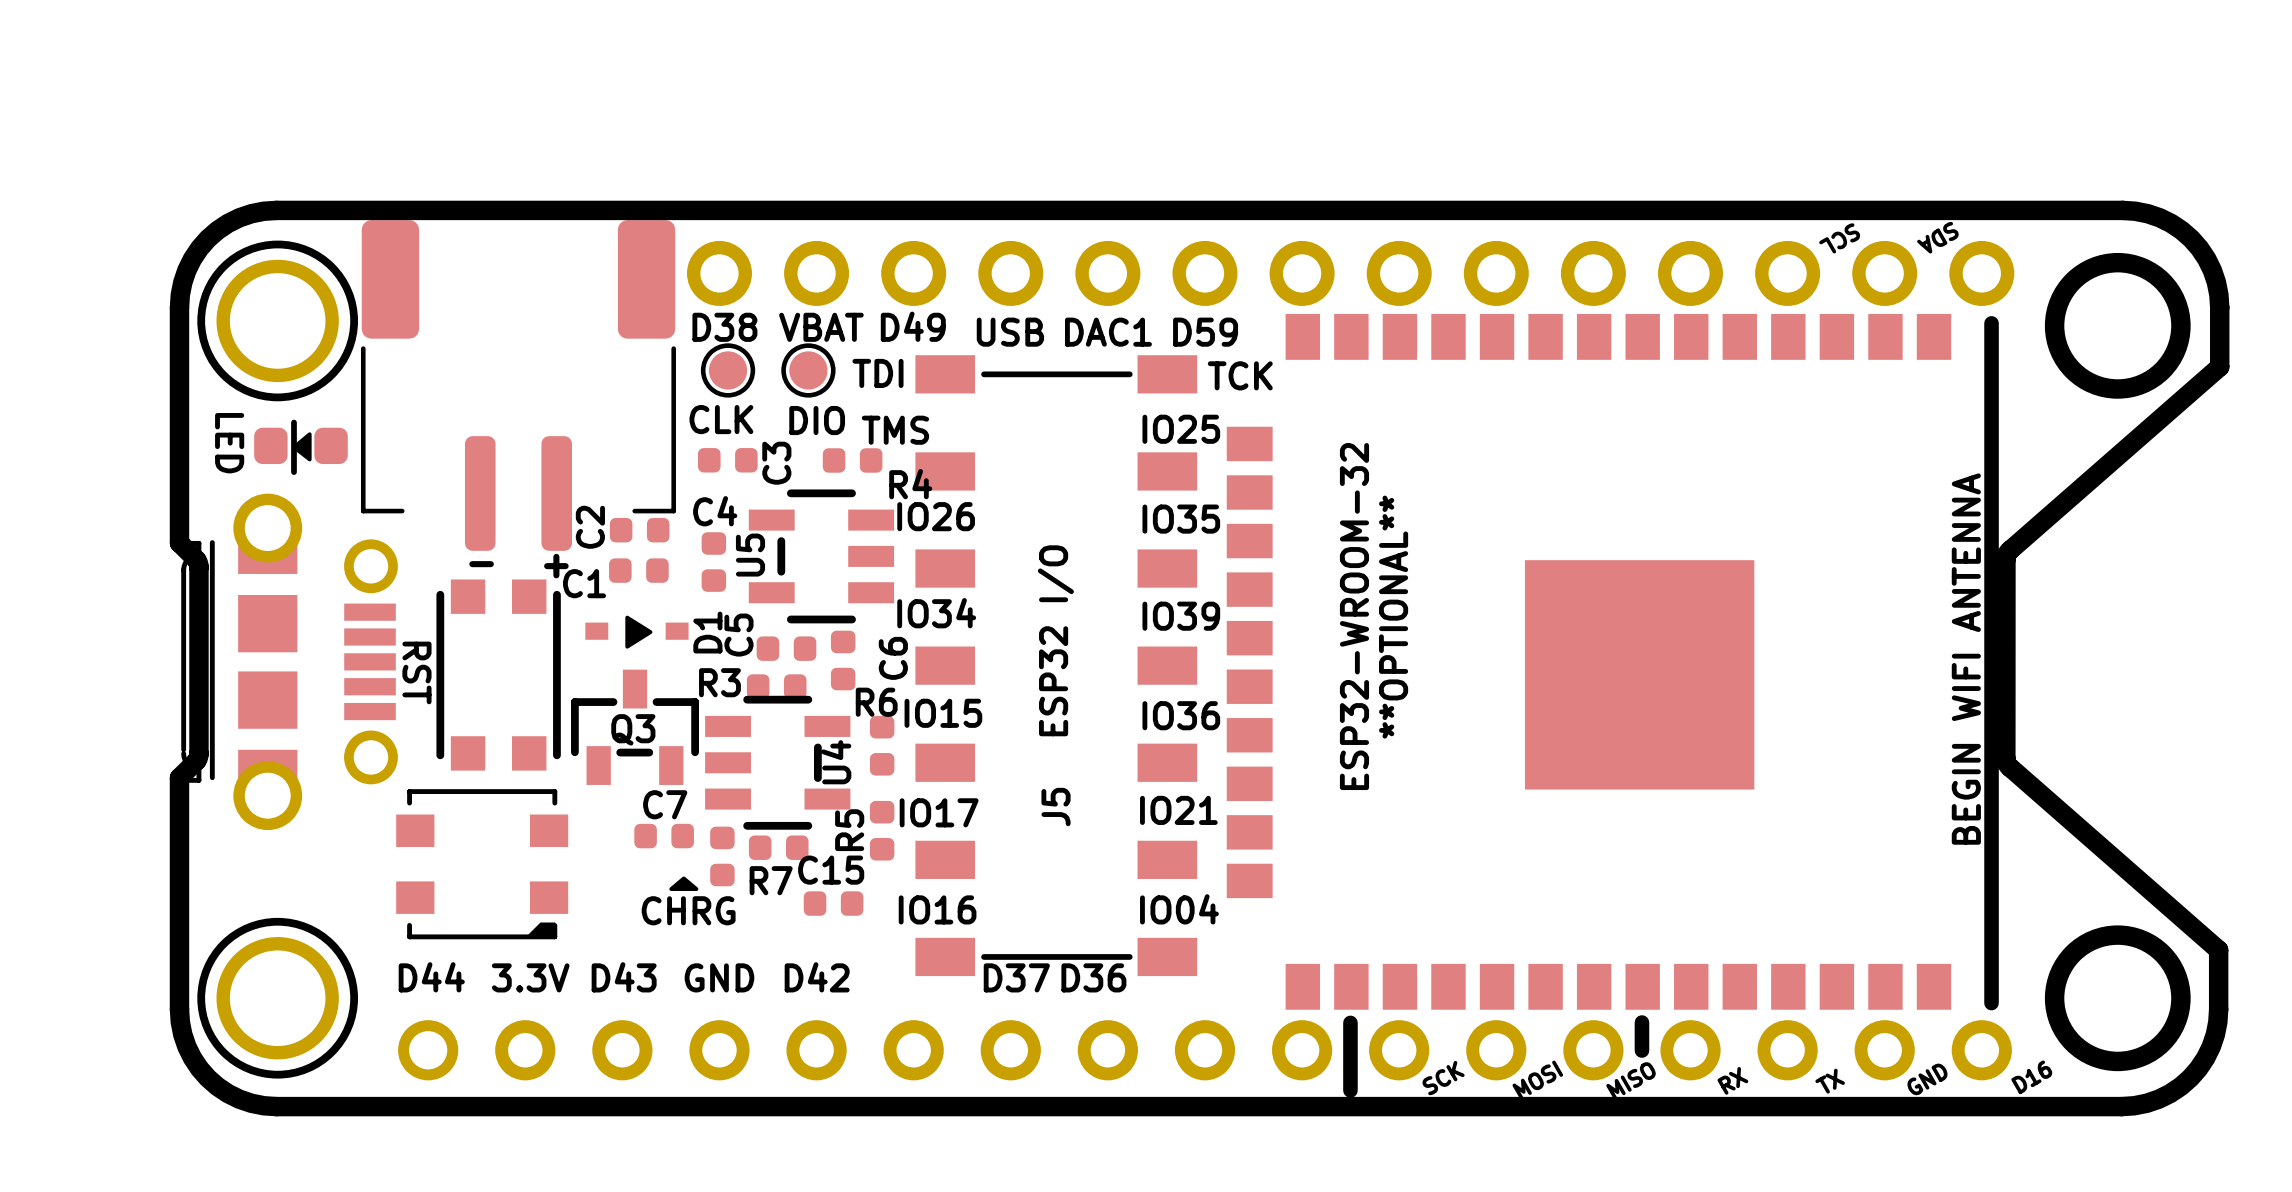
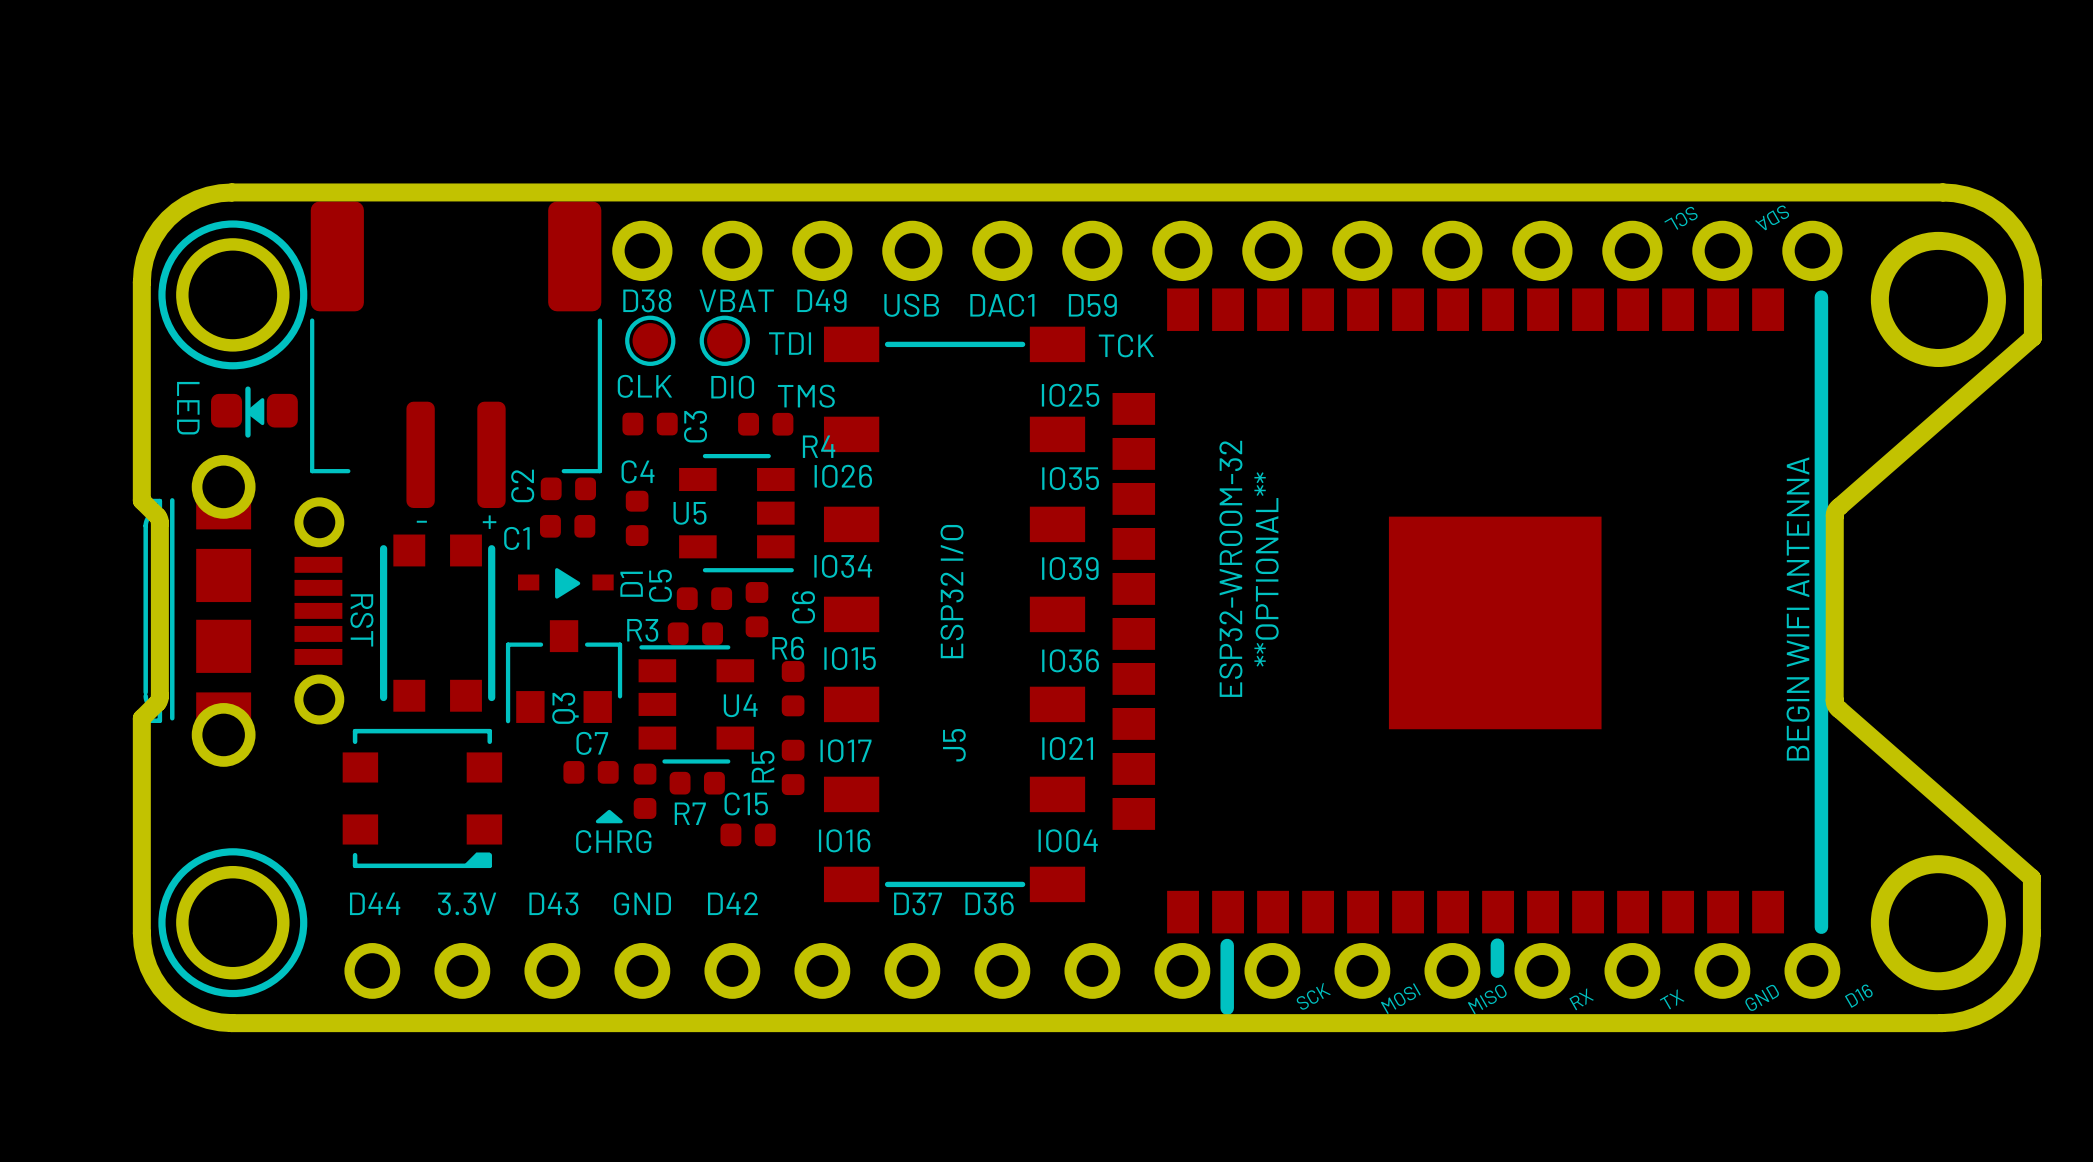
U5 footprint: [748, 489, 895, 624] -> [679, 453, 795, 573]
Q3 footprint: [571, 669, 700, 785] -> [505, 620, 623, 724]
U4 footprint: [705, 695, 851, 830] -> [638, 645, 755, 764]

